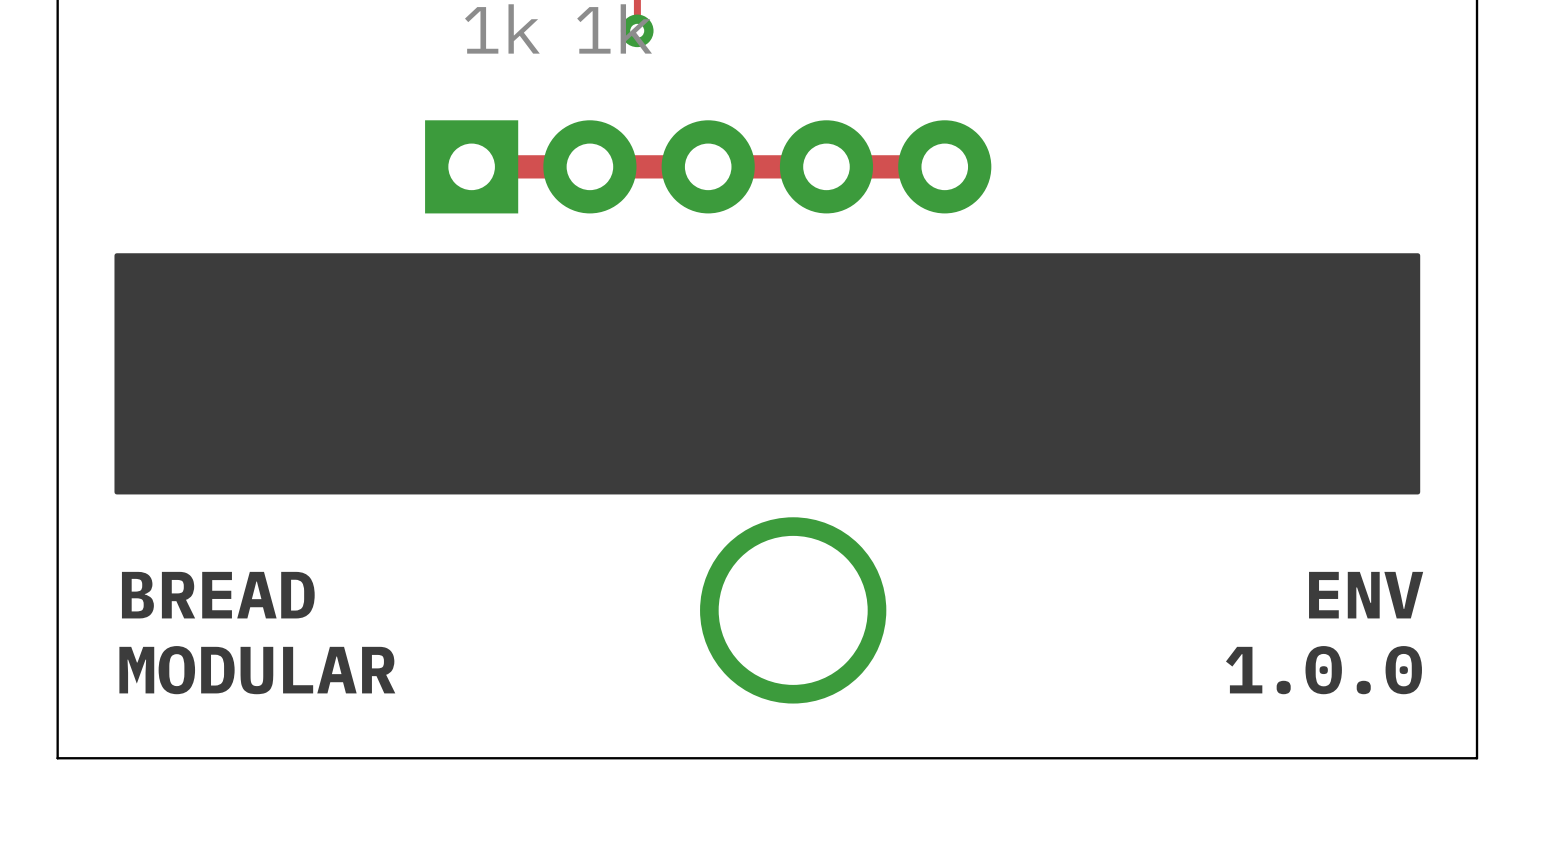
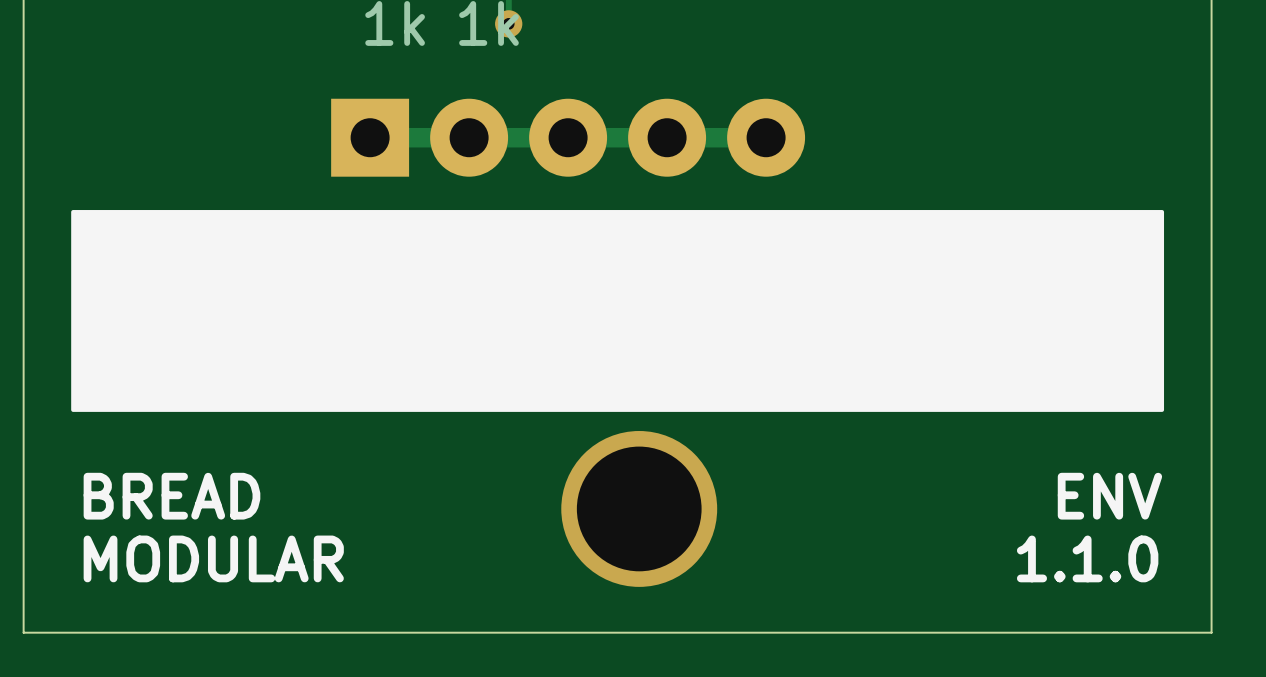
text: 1.0.0 (1323, 670) -> 1.1.0 (1087, 558)

